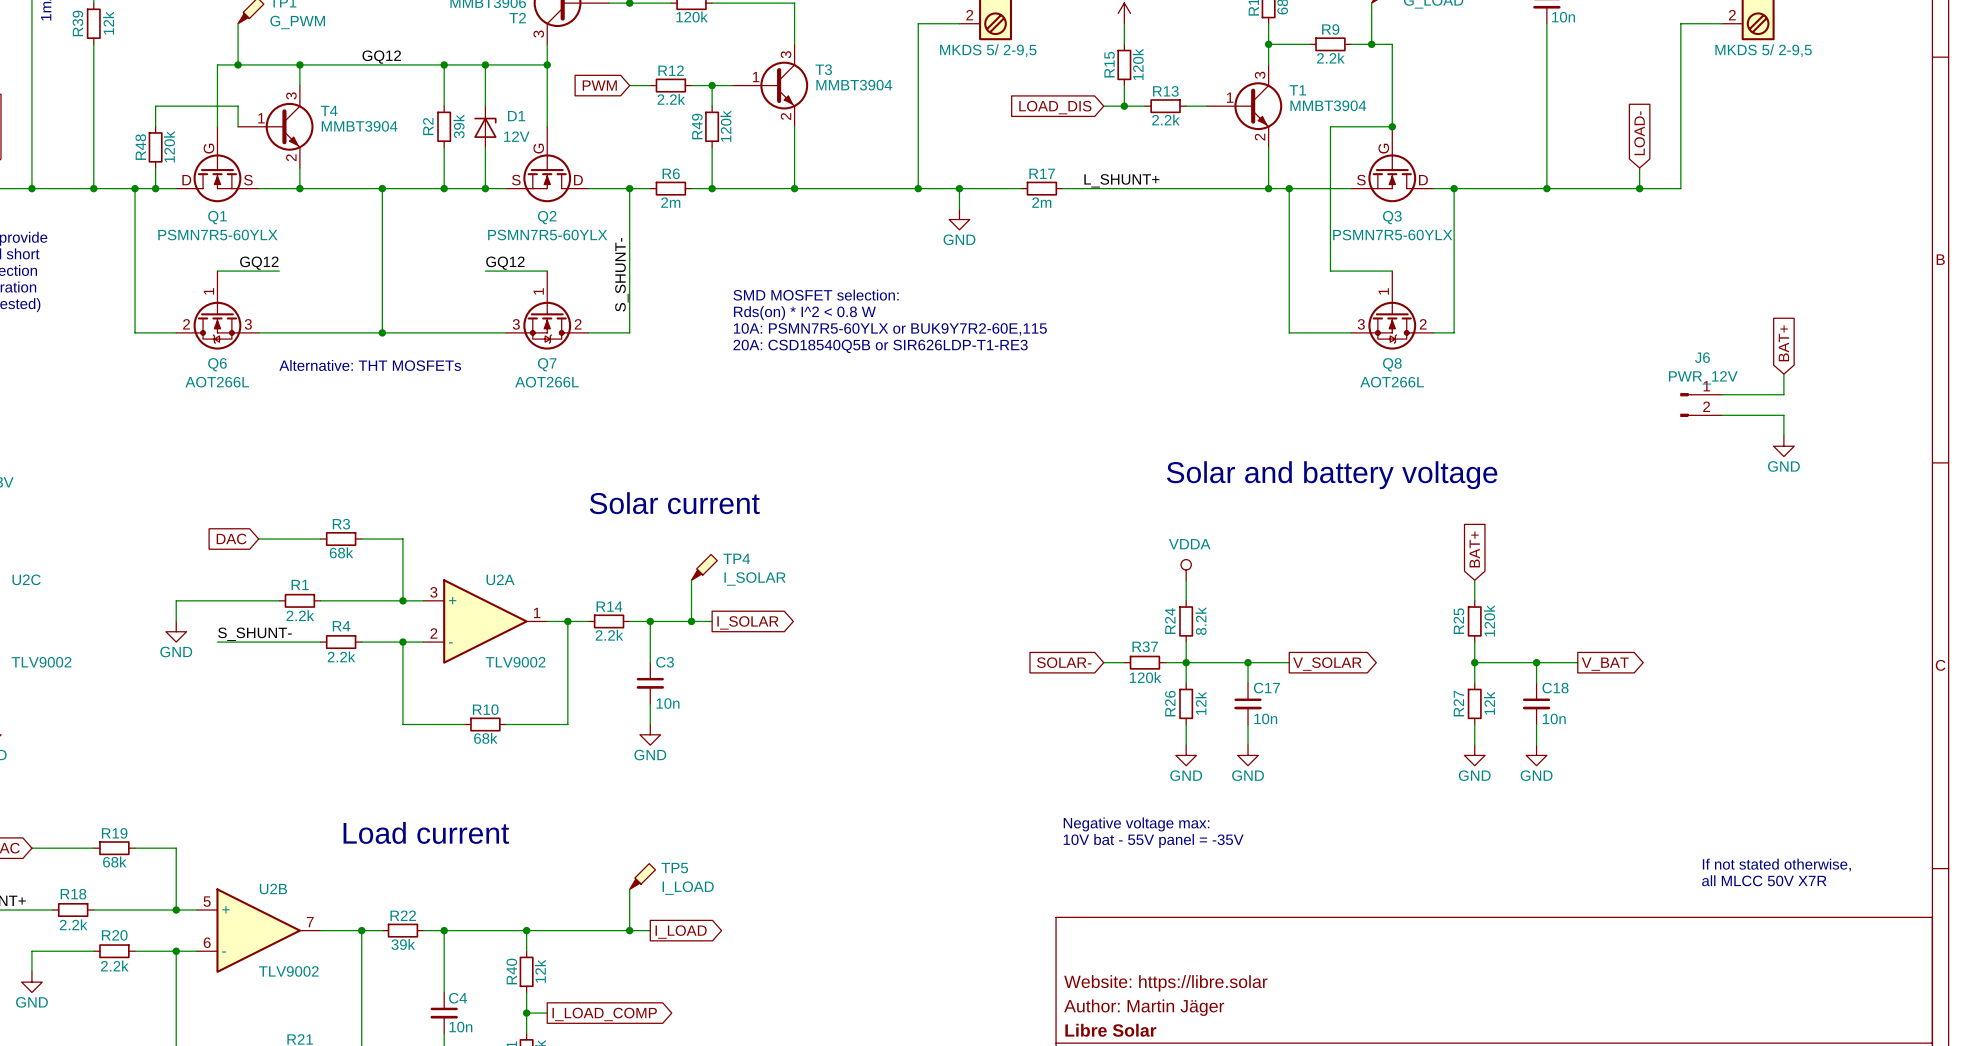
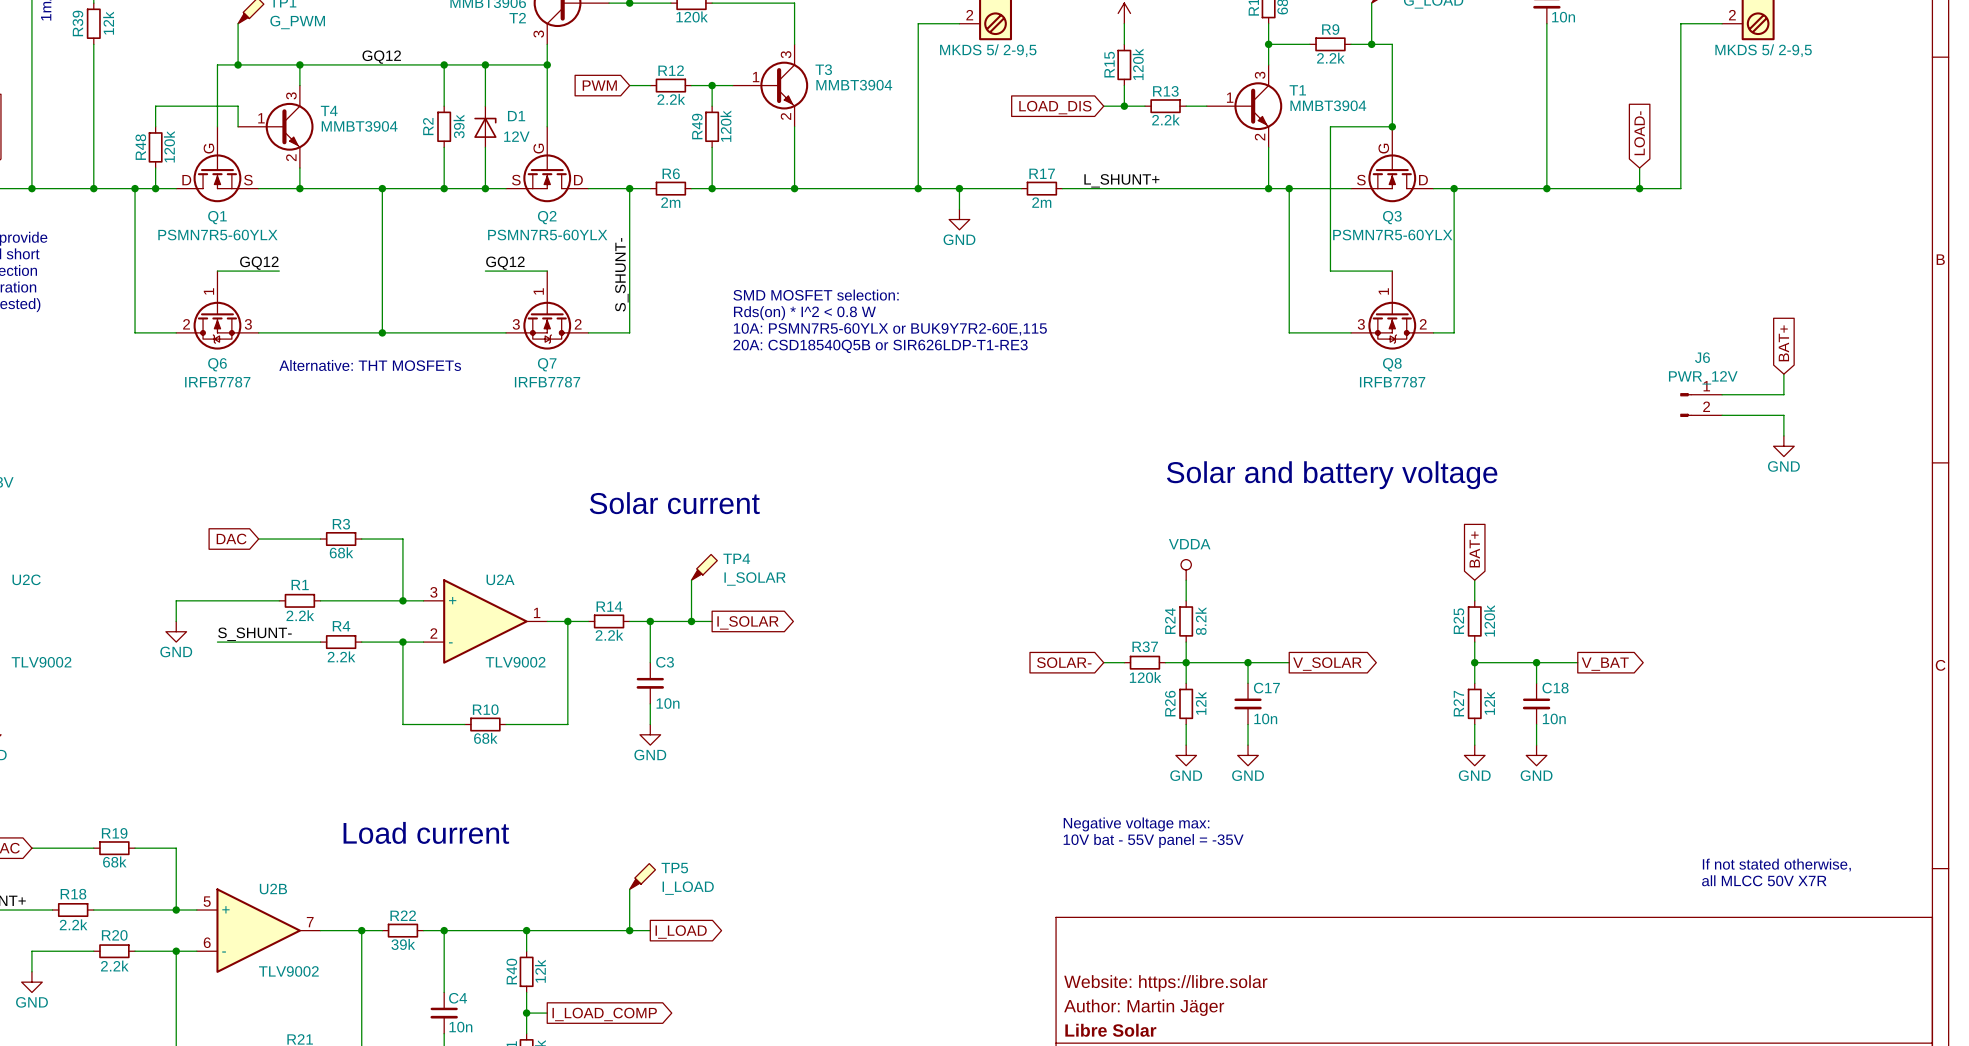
Q6 value: AOT266L (217, 382) -> IRFB7787 (217, 382)
Q7 value: AOT266L (547, 382) -> IRFB7787 (547, 382)
Q8 value: AOT266L (1392, 382) -> IRFB7787 (1392, 382)

